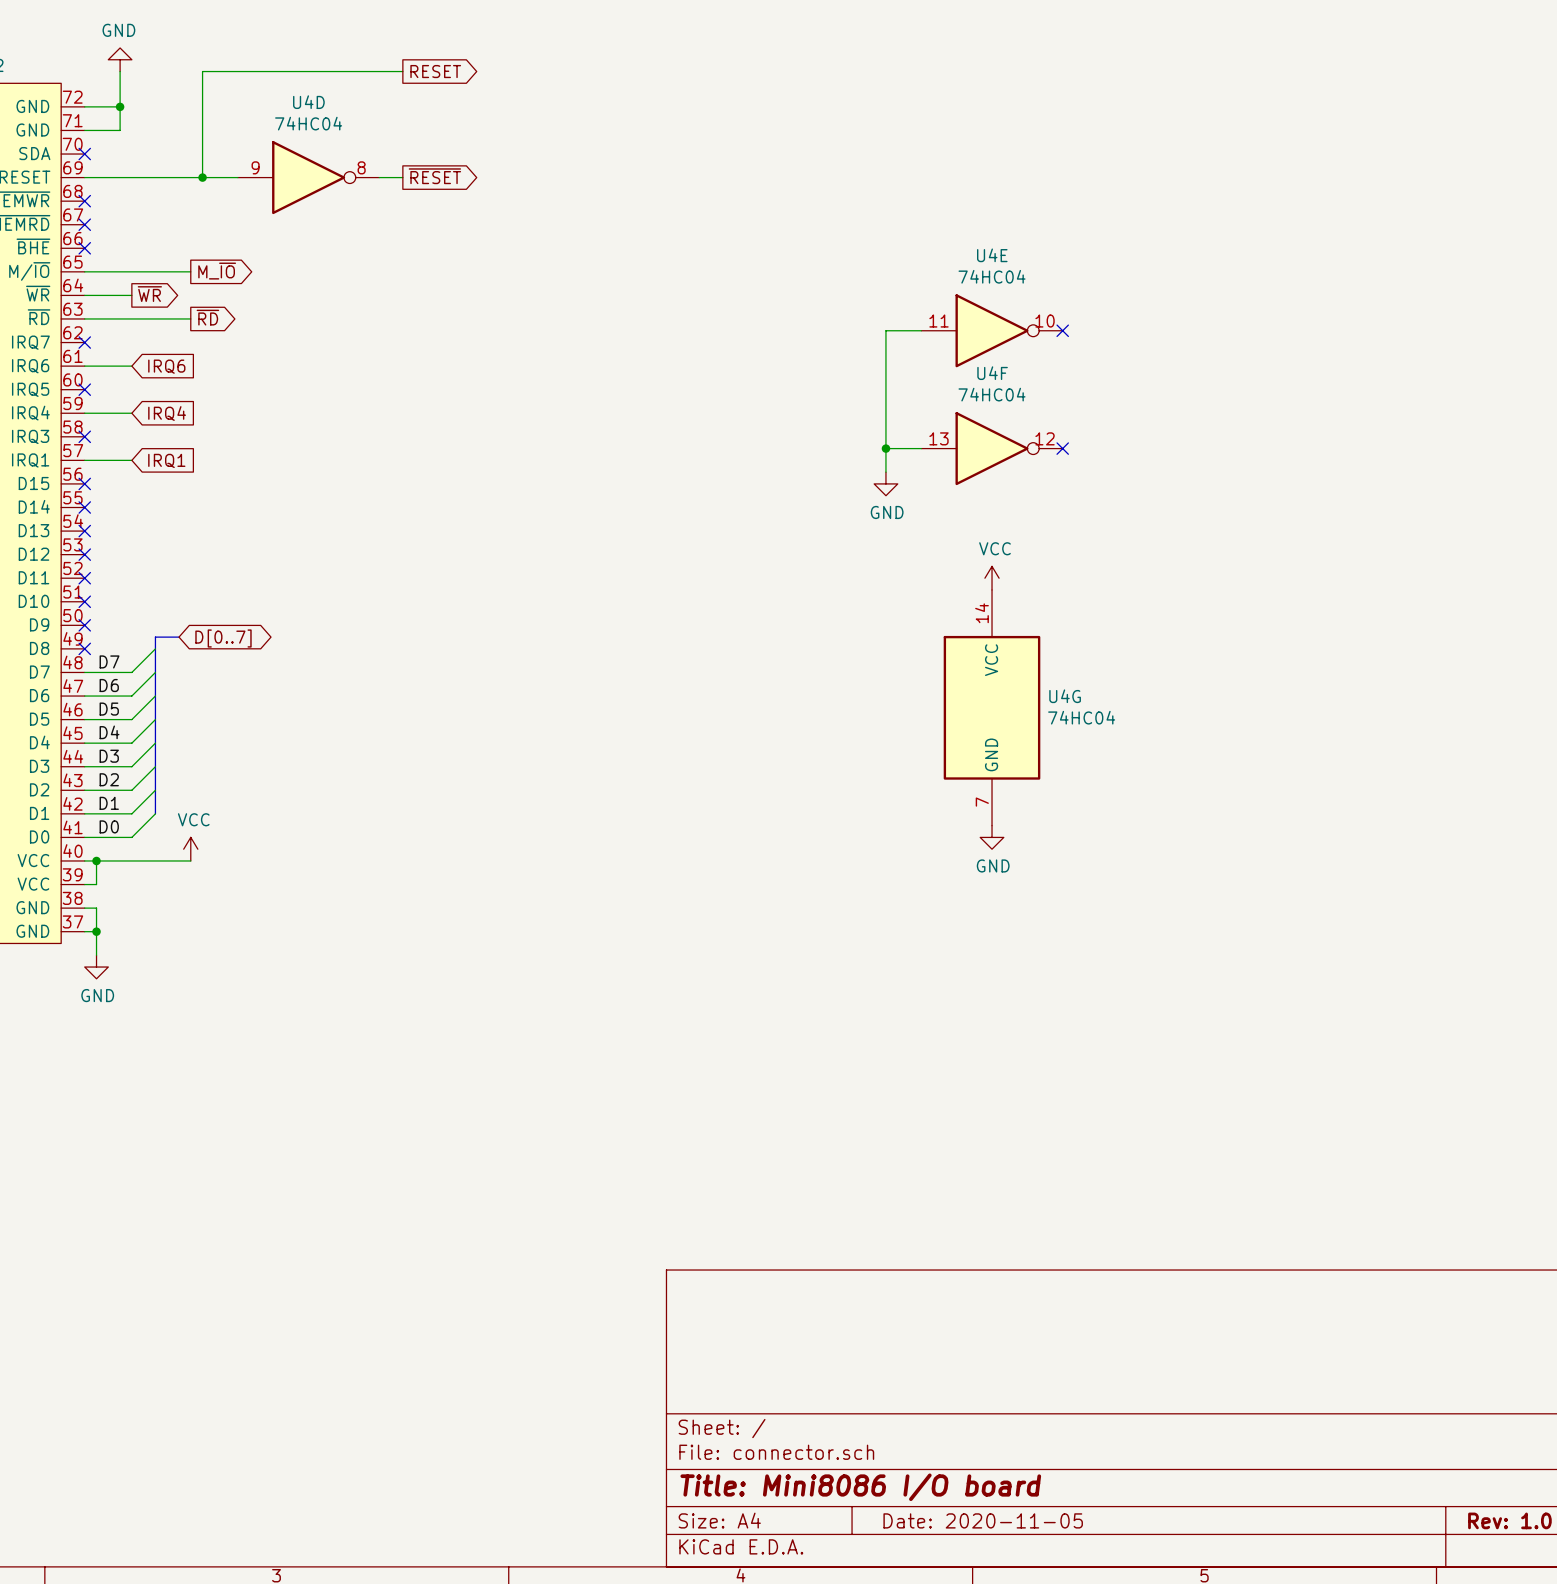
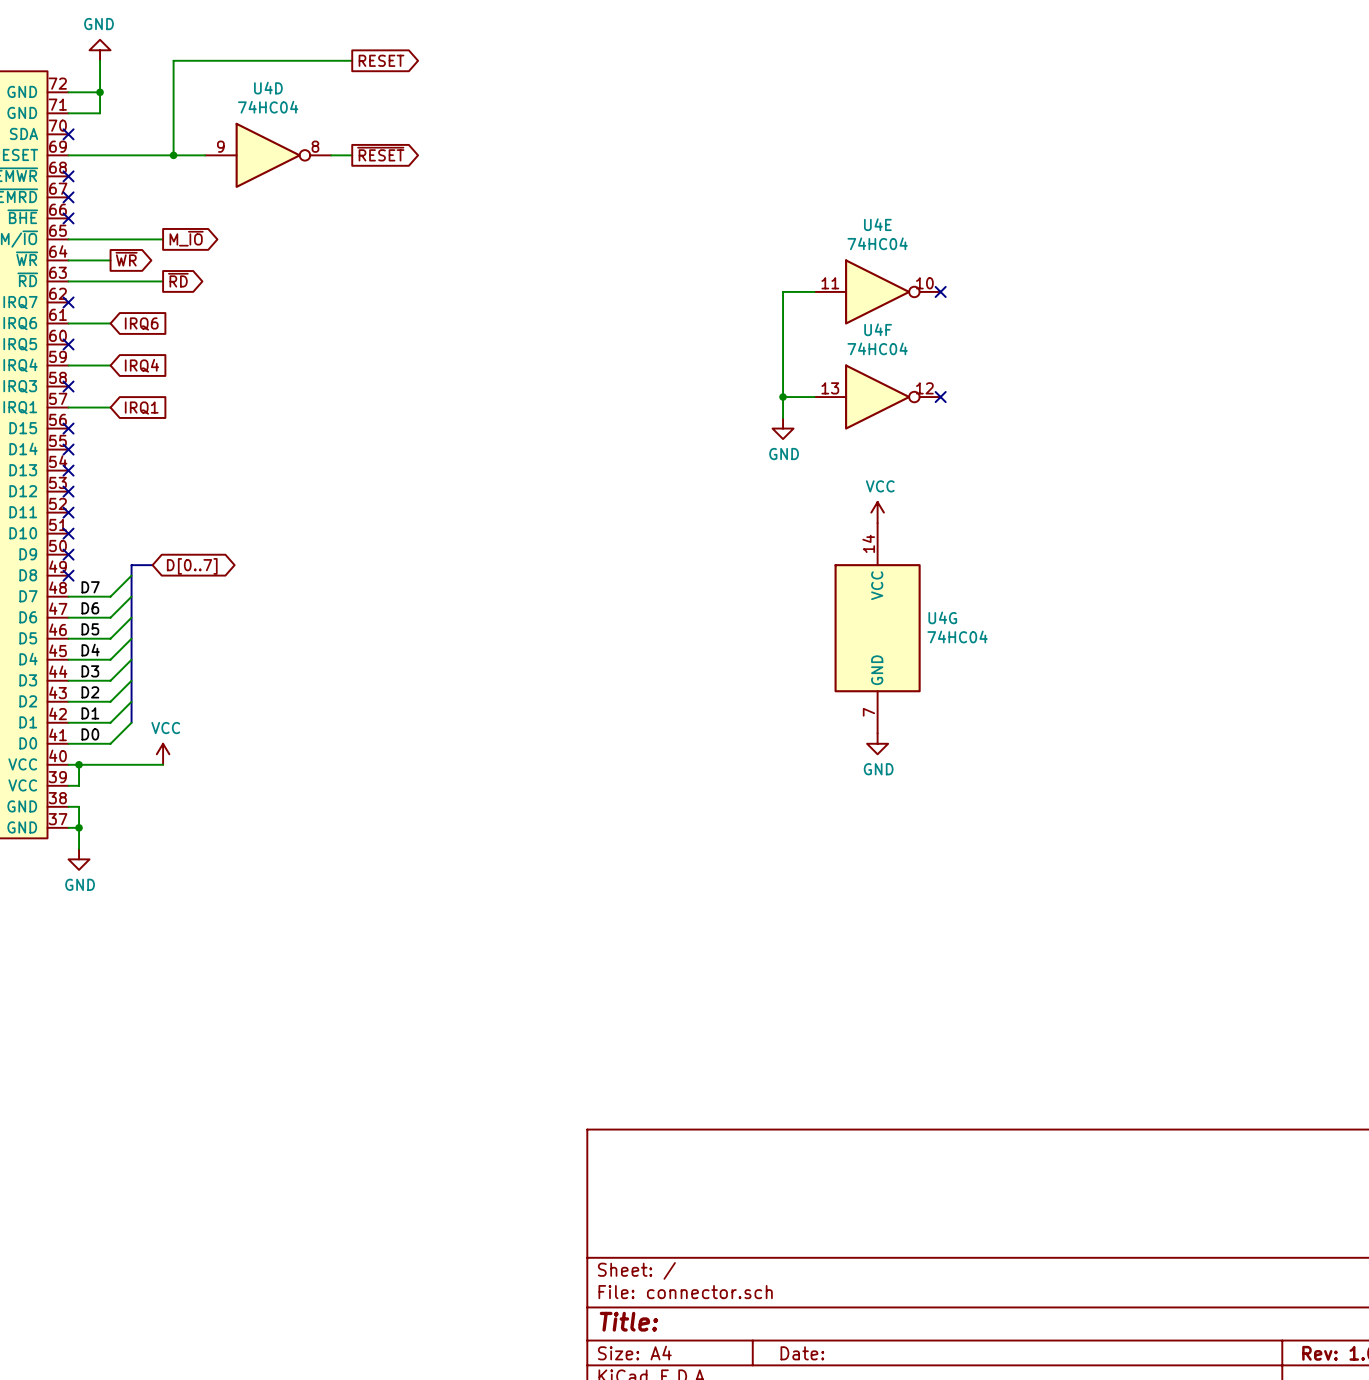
title block: Title: Mini8086 I/O board (860, 1487) -> Title: (628, 1321)
title block: Date: 2020-11-05 (983, 1520) -> Date: (802, 1353)

